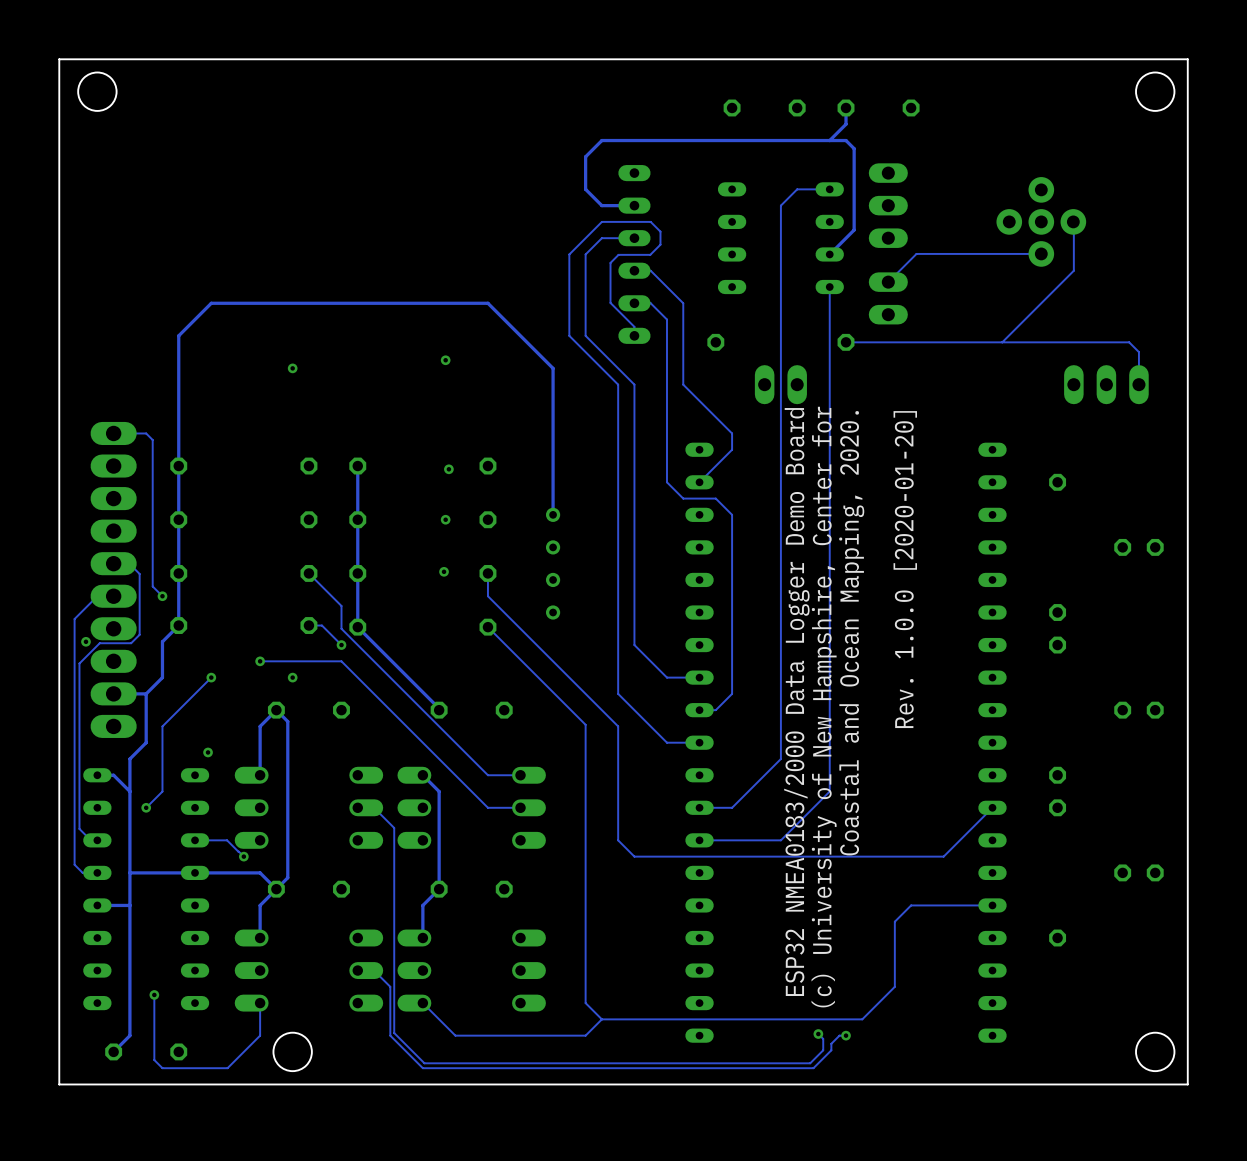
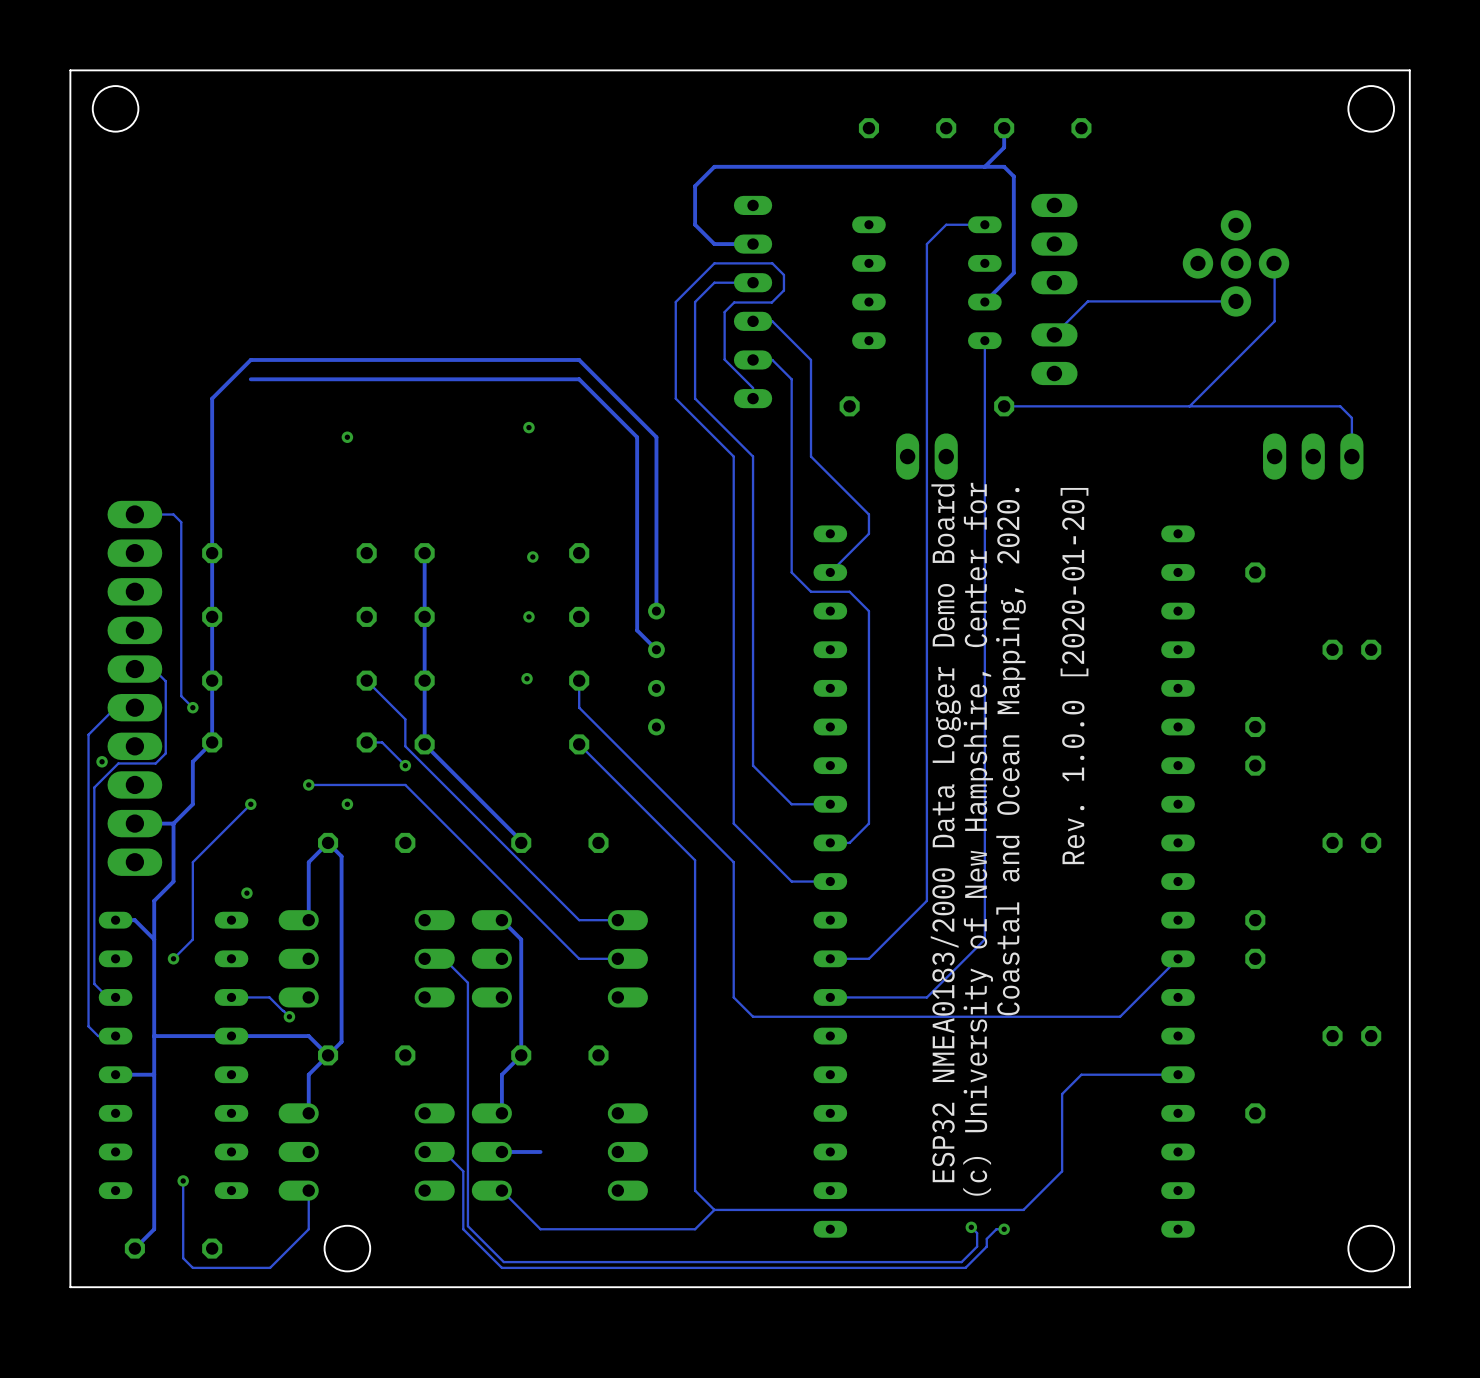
track: none -> (250, 379) (579, 379) (637, 437) (637, 630) (656, 649)
track: none -> (540, 1151) (501, 1151)

